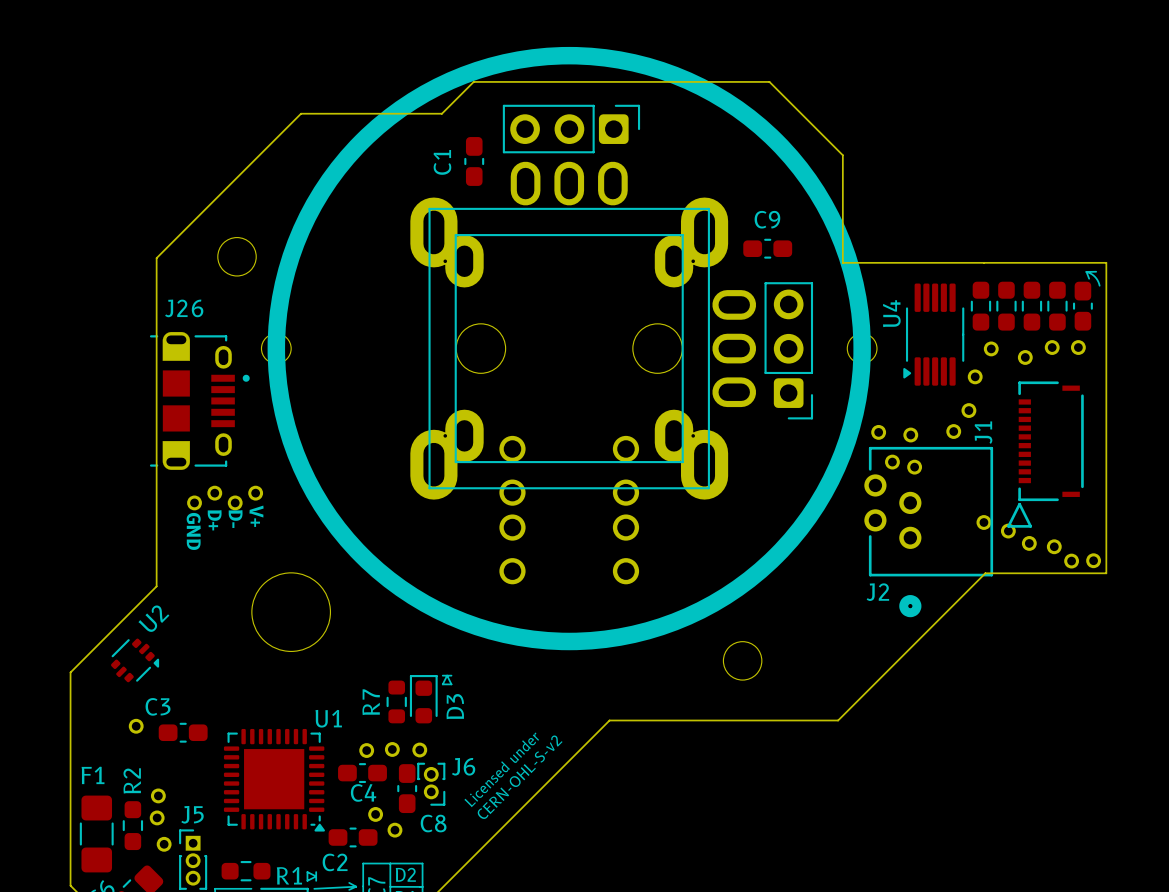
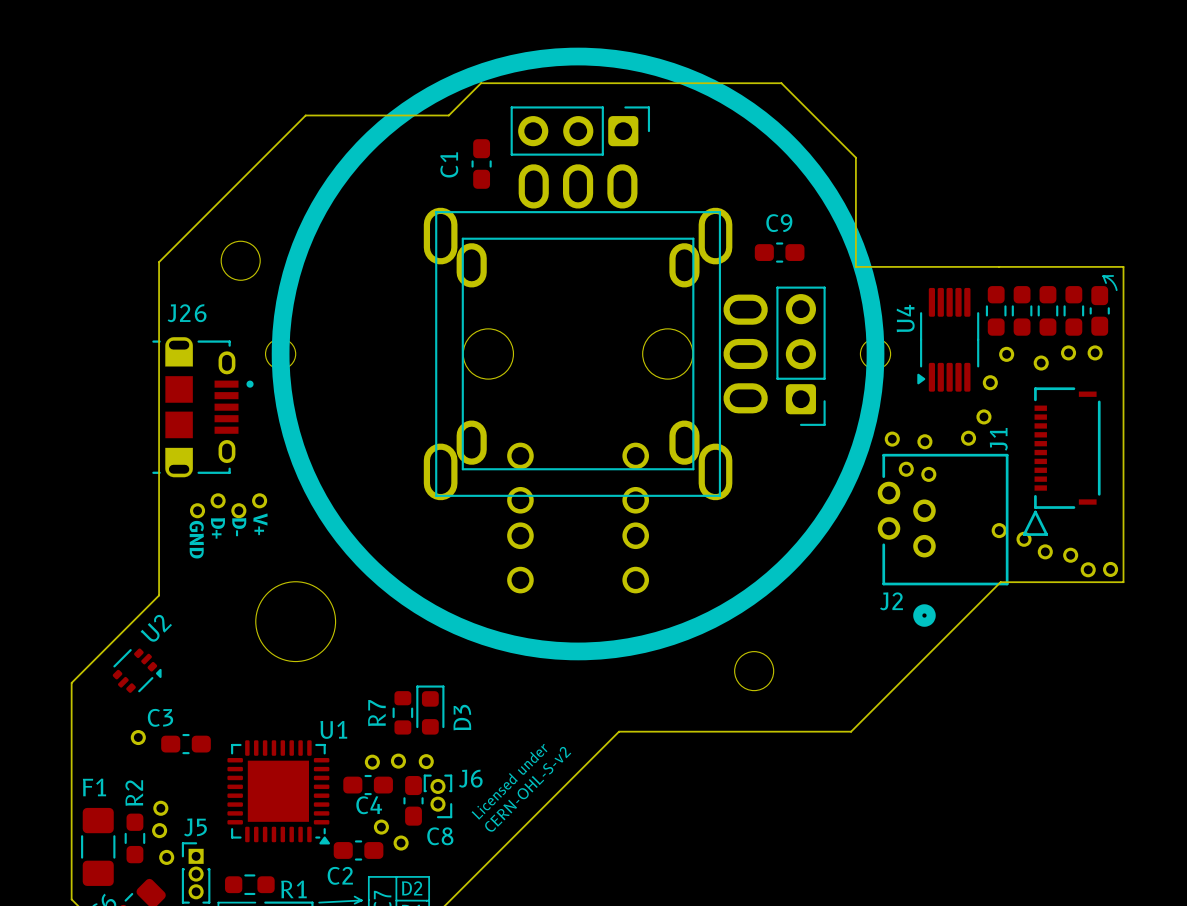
part footprint: [410, 104, 814, 585] -> [423, 106, 826, 594]
line: (442, 675) (451, 675) -> none
line: (447, 675) (451, 684) (442, 684) (447, 675) -> none
line: (307, 872) (307, 880) (316, 876) (307, 872) -> none
line: (316, 872) (316, 880) -> none

